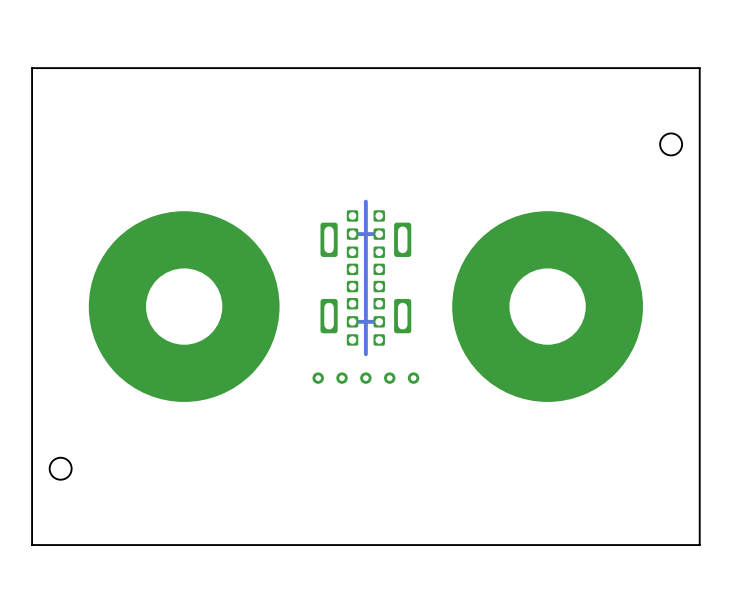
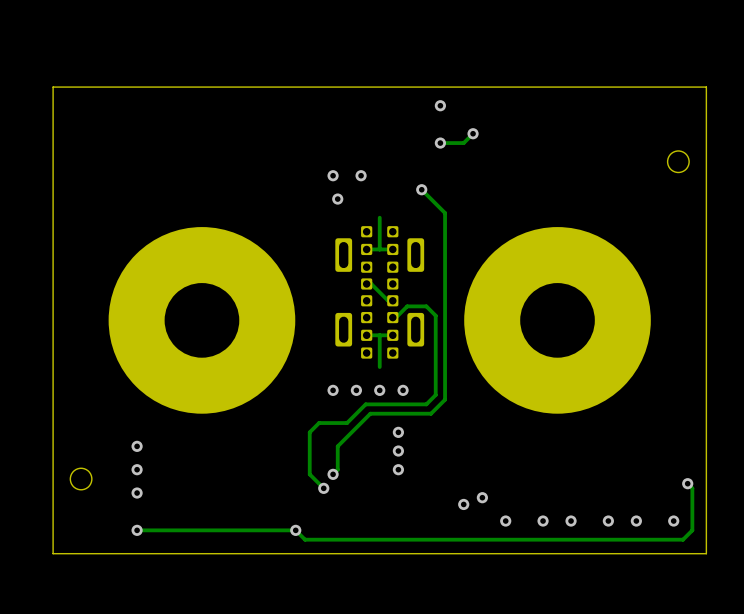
via: none -> (440, 105)
track: none -> (473, 133) (463, 143) (440, 143)
via: none -> (473, 133)
via: none -> (440, 143)
via: none -> (333, 175)
via: none -> (361, 175)
track: none -> (421, 189) (445, 213) (445, 399) (431, 413) (370, 413) (337, 446) (337, 469) (333, 474)
via: none -> (421, 189)
via: none -> (337, 199)
track: (365, 234) (365, 321) -> none
track: none -> (366, 283) (371, 283) (388, 300) (392, 300)
track: none -> (392, 317) (396, 317) (407, 306) (426, 306) (435, 315) (435, 395) (426, 404) (365, 404) (347, 423) (319, 423) (309, 432) (309, 474) (323, 488)
via: (413, 378) -> none
via: none -> (398, 432)
via: none -> (137, 446)
via: none -> (398, 451)
via: none -> (137, 469)
via: none -> (398, 469)
via: none -> (333, 474)
track: none -> (687, 483) (692, 488) (692, 530) (683, 539) (305, 539) (295, 530) (137, 530)
via: none -> (687, 483)
via: none -> (323, 488)
via: none -> (137, 493)
via: none -> (482, 497)
via: none -> (463, 504)
via: none -> (505, 521)
via: none -> (543, 521)
via: none -> (571, 521)
via: none -> (608, 521)
via: none -> (636, 521)
via: none -> (673, 521)
via: none -> (137, 530)
via: none -> (295, 530)

